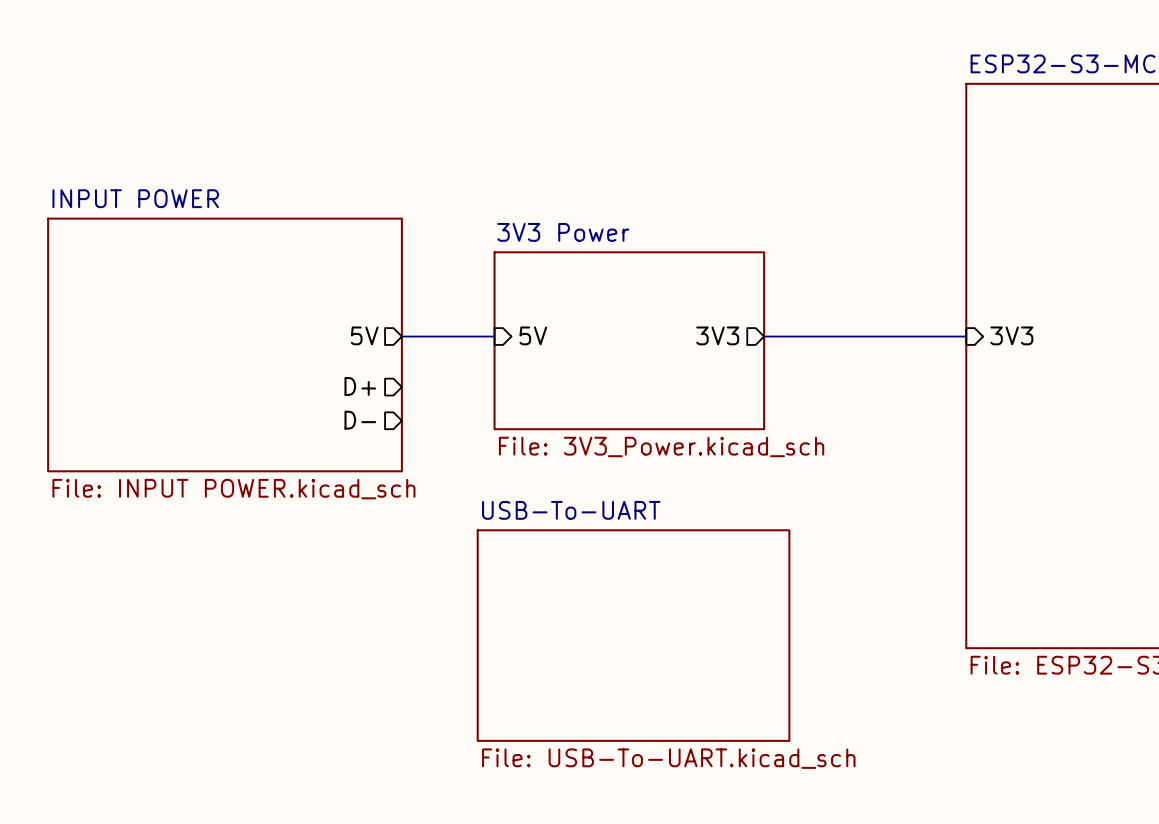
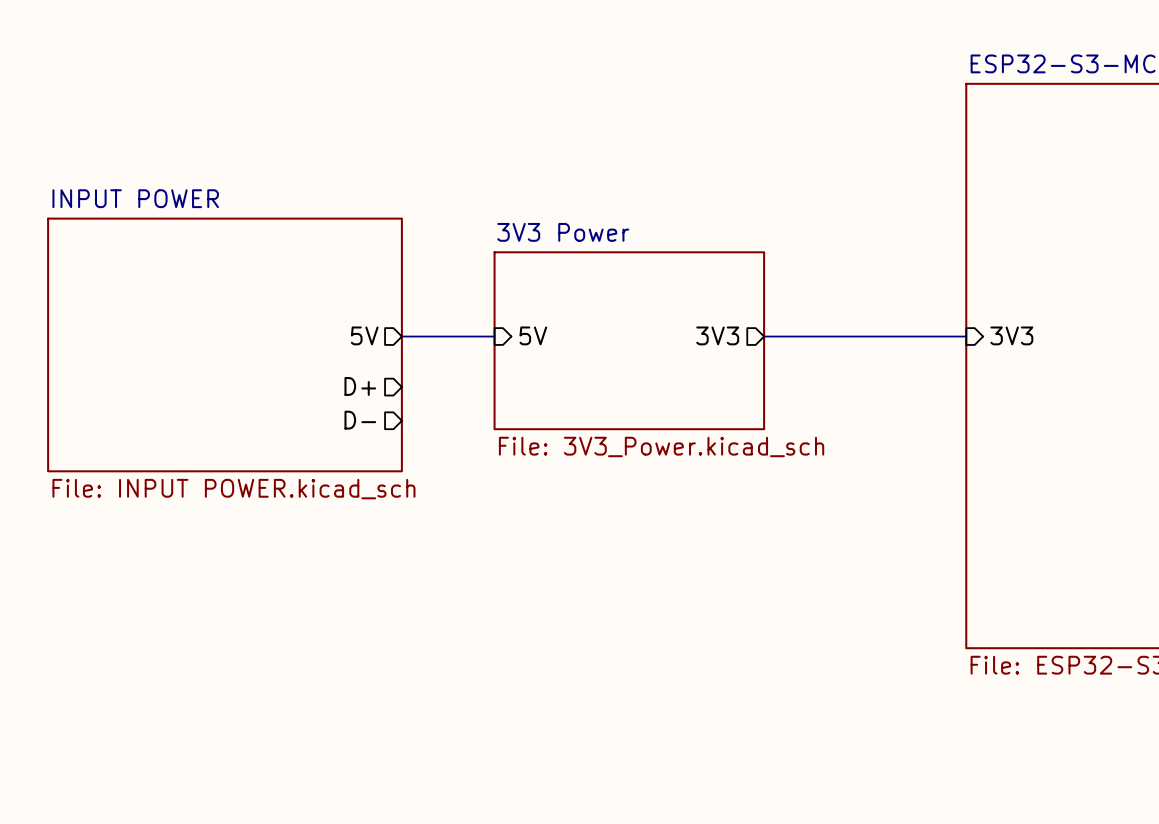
sheet USB-To-UART: File: USB-To-UART.kicad_sch (633, 635) -> none

